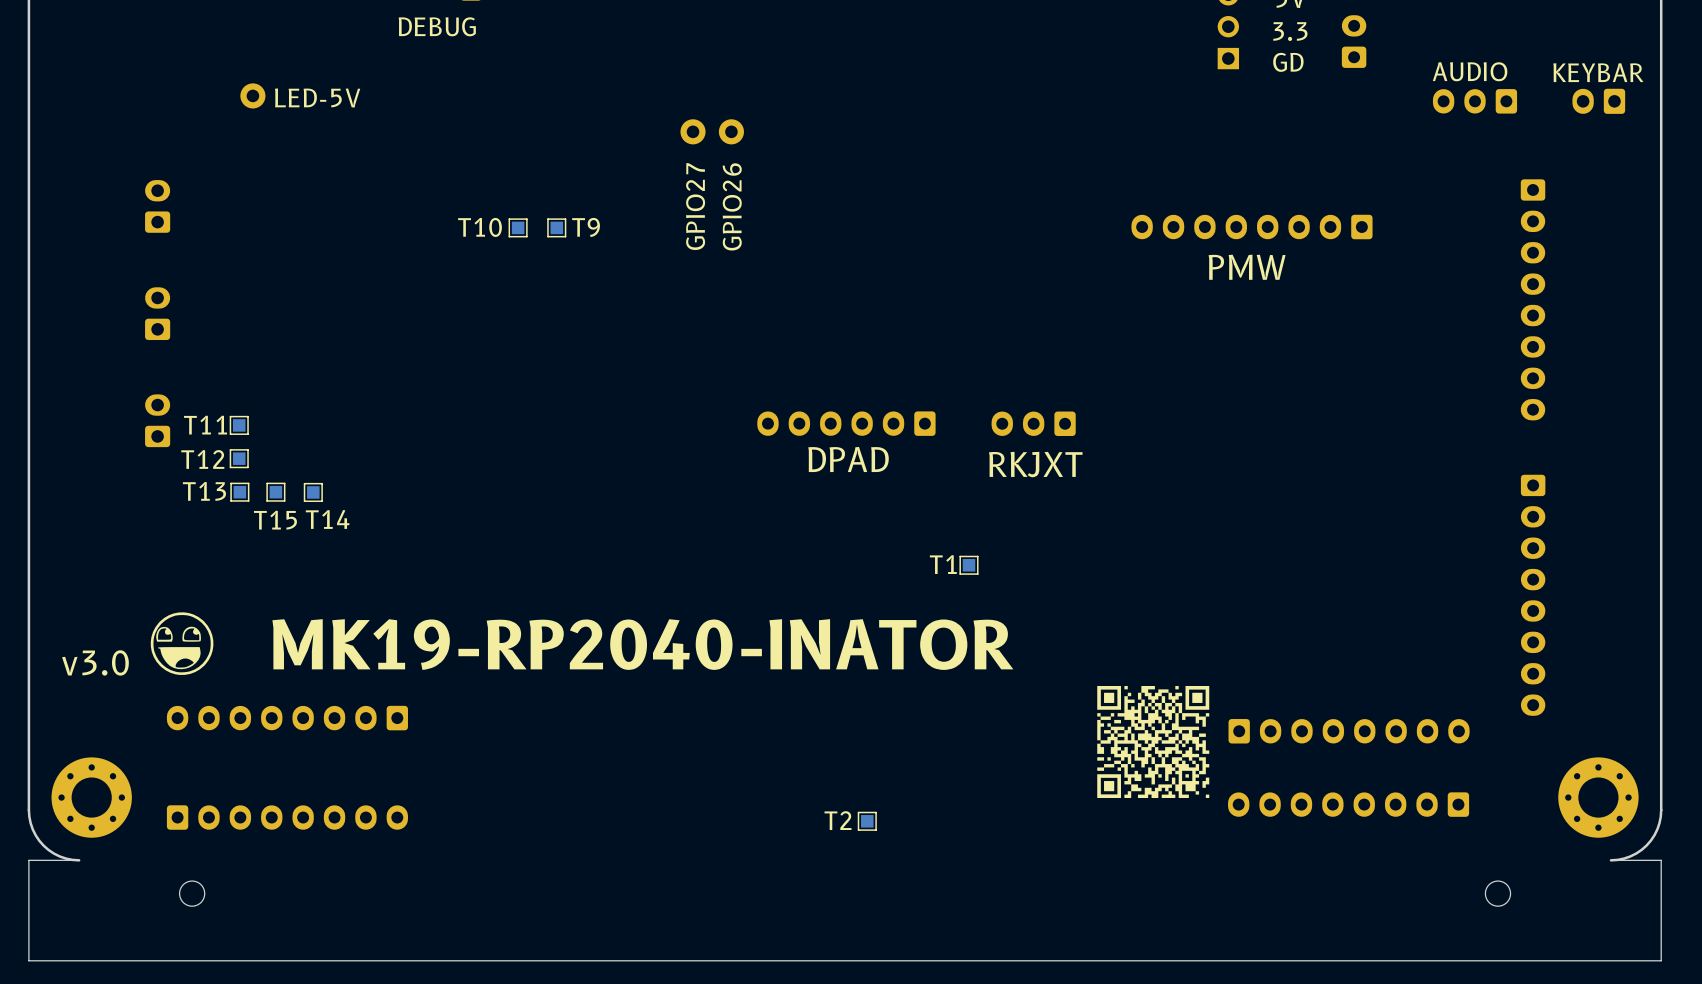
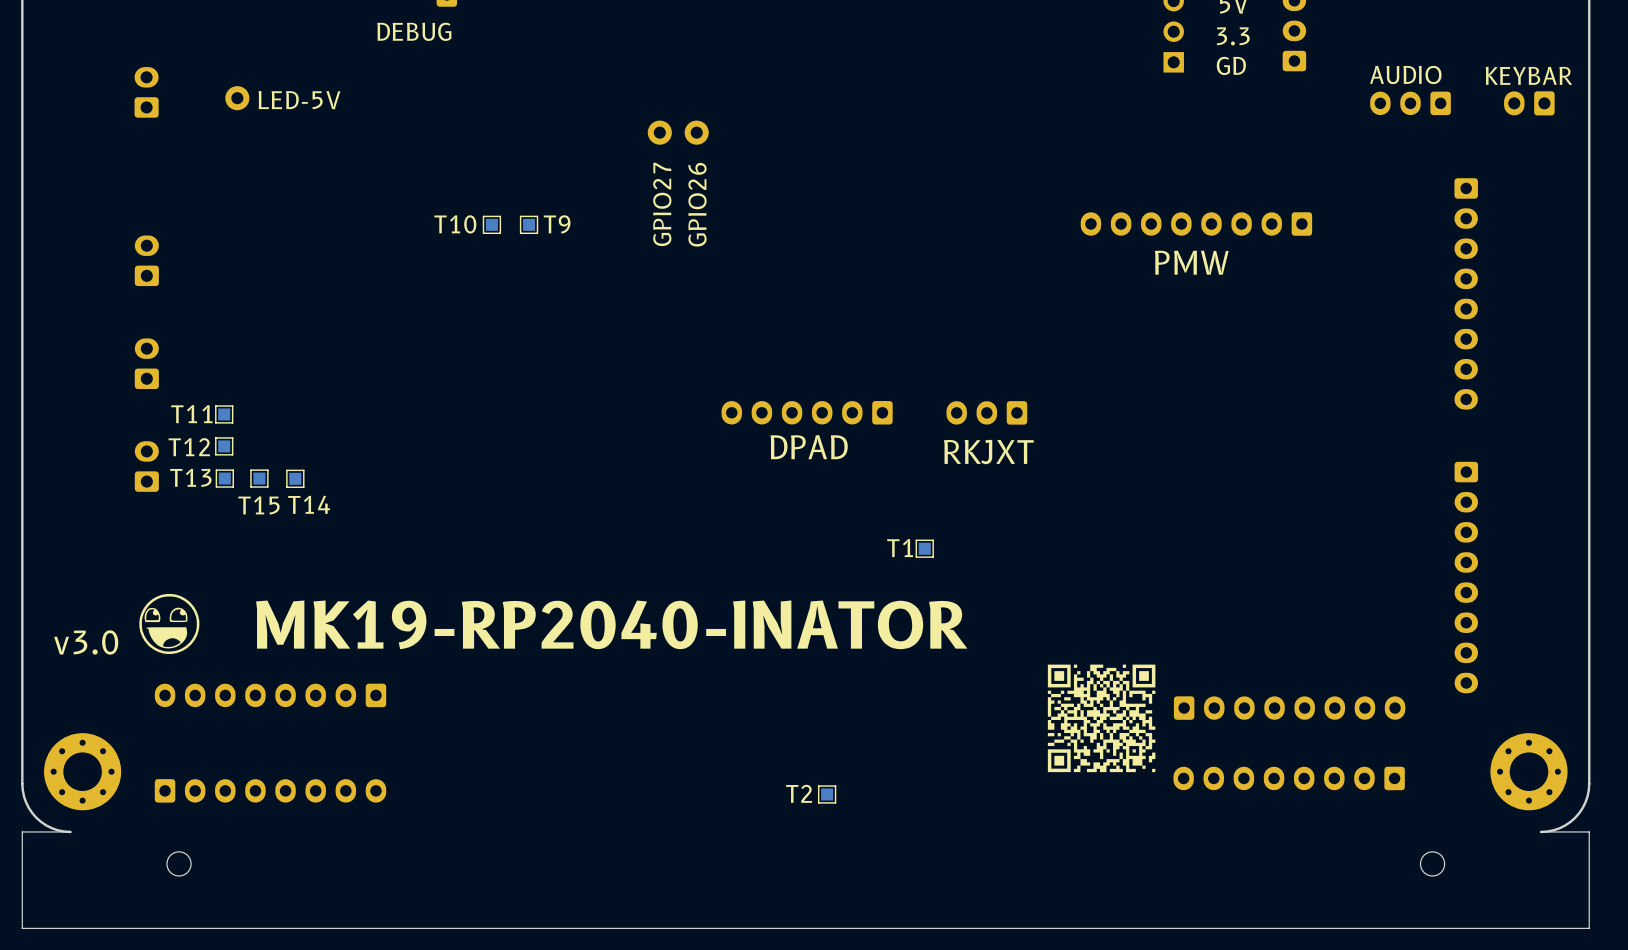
part: none -> (146, 92)
part: (157, 206) -> none
part: none -> (146, 260)
part: (157, 313) -> none
part: none -> (146, 363)
part: (157, 420) -> none
part: none -> (146, 466)

